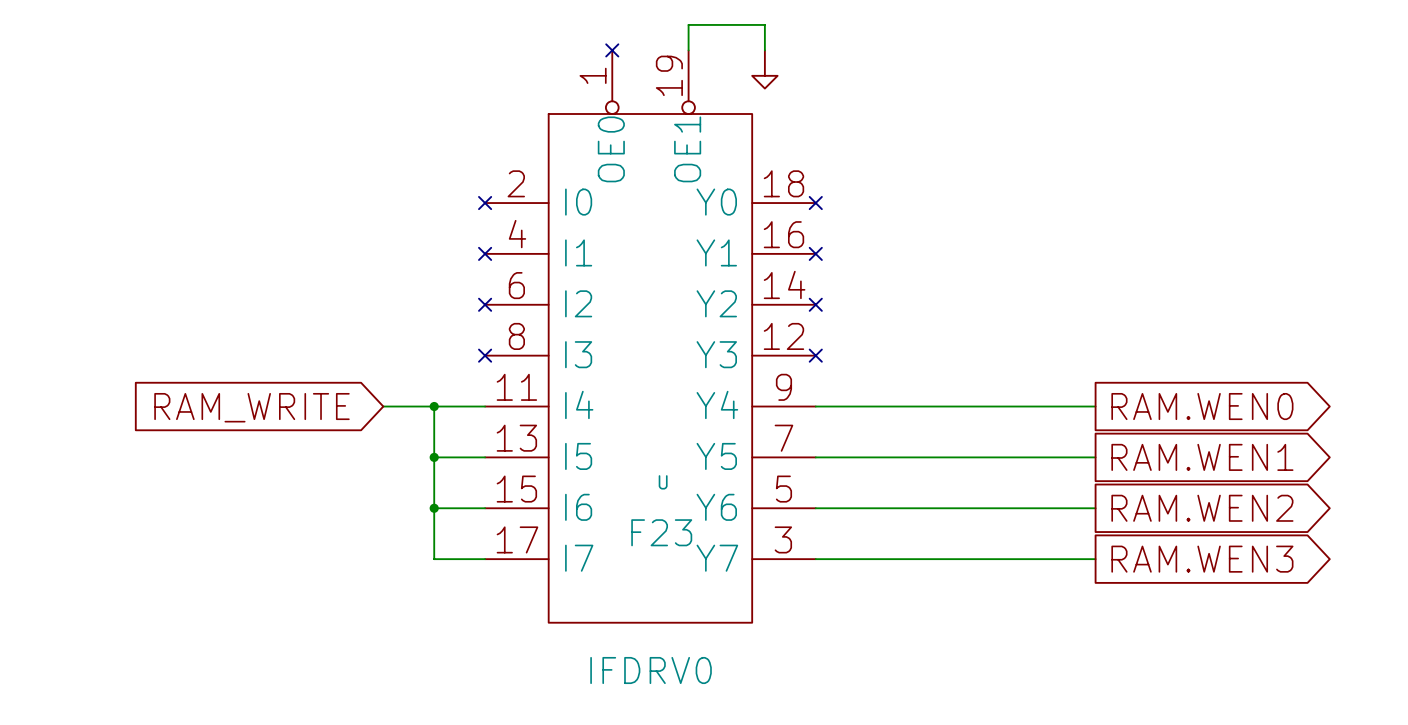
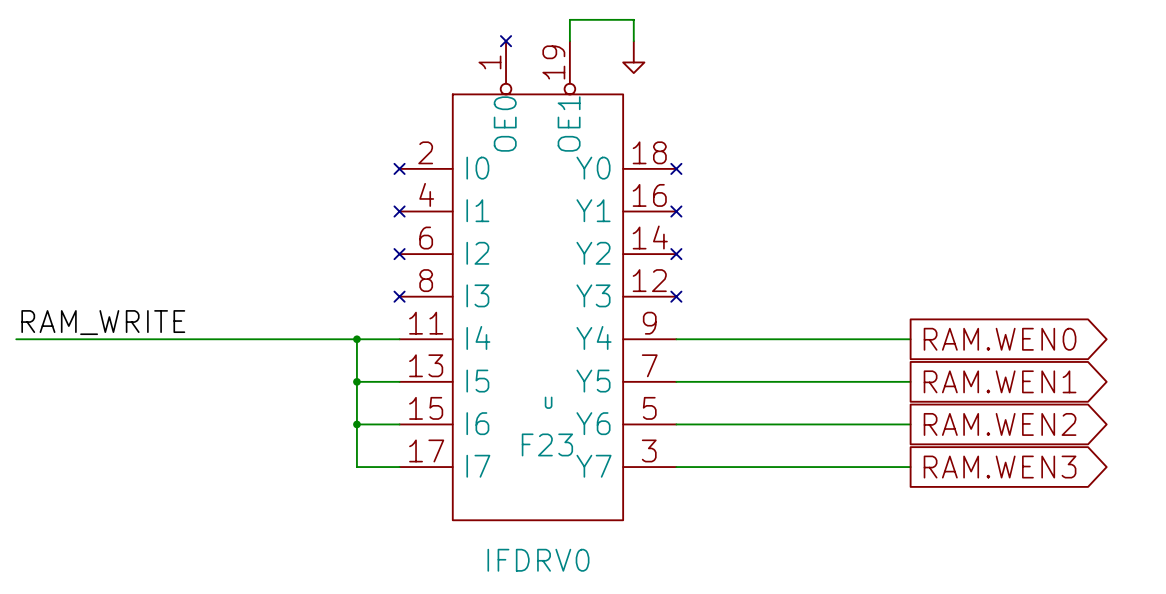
label: none -> RAM_WRITE (103, 322)
wire: none -> (16, 339) (314, 339)
global label: RAM_WRITE (251, 407) -> none

